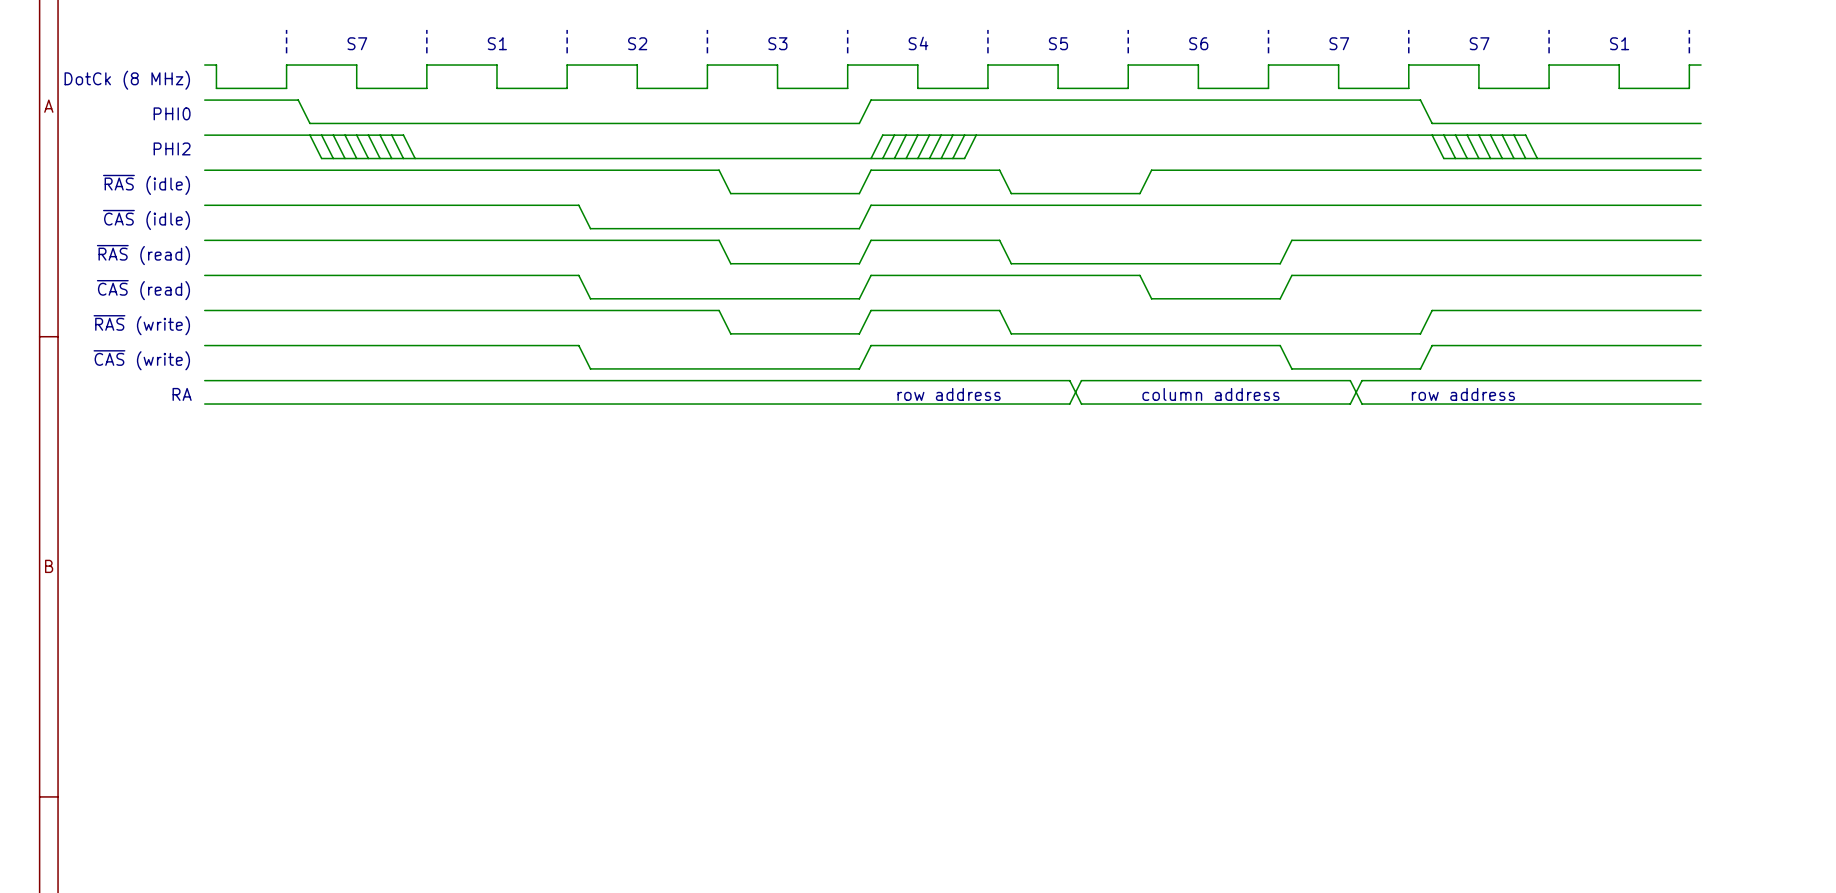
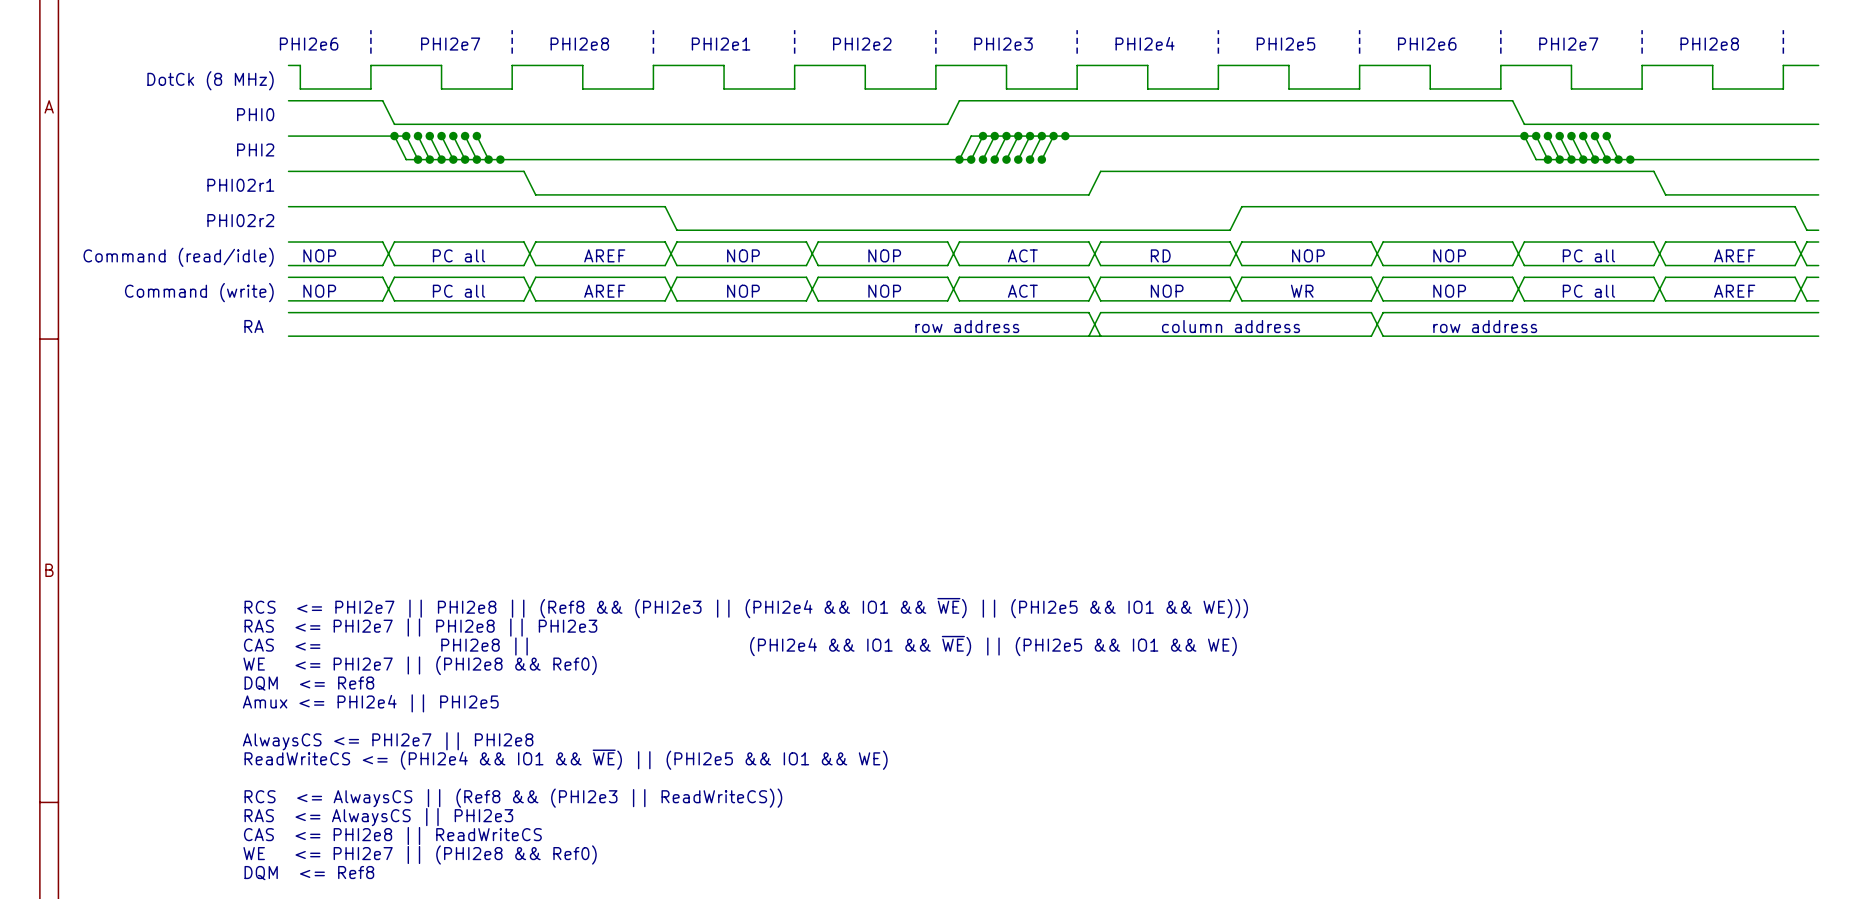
line: (286, 29) (286, 53) -> (370, 30) (370, 53)
line: (426, 29) (426, 53) -> (512, 30) (512, 53)
line: (567, 29) (567, 53) -> (653, 30) (653, 53)
line: (707, 29) (707, 53) -> (794, 30) (794, 53)
line: (847, 29) (847, 53) -> (935, 30) (935, 53)
line: (987, 29) (987, 53) -> (1077, 30) (1077, 53)
line: (1128, 29) (1128, 53) -> (1218, 30) (1218, 53)
line: (1268, 29) (1268, 53) -> (1359, 30) (1359, 53)
line: (1408, 29) (1408, 53) -> (1500, 30) (1500, 53)
line: (1549, 29) (1549, 53) -> (1642, 30) (1642, 53)
line: (1689, 29) (1689, 53) -> (1783, 30) (1783, 53)
text: none -> PHI2e6 (309, 44)
text: S7 (357, 43) -> none
text: none -> PHI2e7 (450, 44)
text: S1 (497, 43) -> none
text: none -> PHI2e8 (579, 44)
text: S2 (637, 43) -> none
text: none -> PHI2e1 (721, 44)
text: S3 (777, 43) -> none
text: none -> PHI2e2 (862, 44)
text: S4 (918, 43) -> none
text: none -> PHI2e3 (1003, 44)
text: S5 (1058, 43) -> none
text: none -> PHI2e4 (1145, 43)
text: S6 (1198, 43) -> none
text: none -> PHI2e5 (1286, 44)
text: S7 (1339, 43) -> none
text: none -> PHI2e6 (1427, 44)
text: S7 (1479, 43) -> none
text: none -> PHI2e7 (1568, 44)
text: S1 (1619, 43) -> none
text: none -> PHI2e8 (1709, 44)
wire: (204, 65) (216, 65) (216, 88) (286, 88) (286, 65) -> none
wire: (298, 65) (356, 65) (356, 88) -> (300, 65) (300, 88) (359, 88)
wire: (426, 65) (426, 88) (368, 88) -> (429, 65) (370, 65) (370, 88)
wire: (438, 65) (496, 65) (496, 88) -> (441, 65) (441, 88) (500, 88)
wire: (567, 65) (567, 88) (508, 88) -> (571, 65) (512, 65) (512, 88)
wire: (578, 65) (637, 65) (637, 88) -> (582, 65) (582, 88) (641, 88)
wire: (707, 65) (707, 88) (648, 88) -> (712, 65) (653, 65) (653, 88)
wire: (719, 65) (777, 65) (777, 88) -> (724, 65) (724, 88) (782, 88)
wire: (847, 65) (847, 88) (789, 88) -> (853, 65) (794, 65) (794, 88)
wire: (859, 65) (917, 65) (917, 88) -> (865, 65) (865, 88) (924, 88)
wire: (987, 65) (987, 88) (929, 88) -> (994, 65) (935, 65) (935, 88)
wire: (999, 65) (1058, 65) (1058, 88) -> (1006, 65) (1006, 88) (1065, 88)
wire: (1128, 65) (1128, 88) (1069, 88) -> (1135, 65) (1077, 65) (1077, 88)
wire: (1139, 65) (1198, 65) (1198, 88) -> (1147, 65) (1147, 88) (1206, 88)
wire: (1268, 65) (1268, 88) (1210, 88) -> (1277, 65) (1218, 65) (1218, 88)
wire: (1280, 65) (1338, 65) (1338, 88) -> (1288, 65) (1288, 88) (1347, 88)
wire: (1408, 65) (1408, 88) (1350, 88) -> (1418, 65) (1359, 65) (1359, 88)
wire: (1420, 65) (1478, 65) (1478, 88) -> (1430, 65) (1430, 88) (1489, 88)
wire: (1549, 65) (1549, 88) (1490, 88) -> (1559, 65) (1500, 65) (1500, 88)
wire: (1560, 65) (1619, 65) (1619, 88) -> (1571, 65) (1571, 88) (1630, 88)
wire: (1689, 65) (1689, 88) (1630, 88) -> (1700, 65) (1642, 65) (1642, 88)
wire: none -> (1712, 65) (1712, 88) (1783, 88) (1783, 65) (1818, 65)
text position: DotCk (8 MHz) (127, 80) -> DotCk (8 MHz) (210, 80)
wire: (204, 100) (286, 100) -> none
wire: (298, 100) (309, 123) (391, 123) -> (300, 100) (382, 100) (394, 124)
wire: (952, 100) (871, 100) (859, 123) -> (959, 100) (947, 124) (865, 124)
wire: (1420, 100) (1432, 123) (1513, 123) -> (1430, 100) (1512, 100) (1524, 124)
text position: PHI0 (172, 113) -> PHI0 (255, 114)
wire: none -> (1712, 124) (1818, 124)
wire: (204, 135) (286, 135) -> none
wire: (309, 135) (321, 158) (403, 158) -> none
wire: (321, 135) (333, 158) -> (418, 136) (429, 159)
wire: (333, 135) (345, 158) -> (429, 136) (441, 159)
wire: (345, 135) (356, 158) -> (441, 136) (453, 159)
wire: (356, 135) (368, 158) -> (453, 136) (465, 159)
wire: (368, 135) (380, 158) -> (465, 136) (476, 159)
wire: (380, 135) (391, 158) -> (476, 136) (488, 159)
junction: none -> (394, 136)
junction: none -> (406, 136)
junction: none -> (418, 136)
junction: none -> (429, 136)
junction: none -> (441, 136)
junction: none -> (453, 136)
junction: none -> (465, 136)
junction: none -> (476, 136)
wire: (894, 135) (882, 158) -> (994, 136) (982, 159)
wire: (906, 135) (894, 158) -> (1006, 136) (994, 159)
wire: (917, 135) (906, 158) -> (1018, 136) (1006, 159)
wire: (929, 135) (917, 158) -> (1030, 136) (1018, 159)
wire: (941, 135) (929, 158) -> (1041, 136) (1030, 159)
wire: (952, 135) (941, 158) -> (1053, 136) (1041, 159)
wire: (964, 135) (882, 135) (871, 158) -> none
junction: none -> (982, 136)
junction: none -> (994, 136)
junction: none -> (1006, 136)
junction: none -> (1018, 136)
junction: none -> (1030, 136)
junction: none -> (1041, 136)
junction: none -> (1053, 136)
junction: none -> (1065, 136)
wire: (1432, 135) (1443, 158) (1525, 158) -> none
wire: (1443, 135) (1455, 158) -> (1547, 136) (1559, 159)
wire: (1455, 135) (1467, 158) -> (1559, 136) (1571, 159)
wire: (1467, 135) (1478, 158) -> (1571, 136) (1583, 159)
wire: (1478, 135) (1490, 158) -> (1583, 136) (1595, 159)
wire: (1490, 135) (1502, 158) -> (1595, 136) (1606, 159)
wire: (1502, 135) (1513, 158) -> (1606, 136) (1618, 159)
junction: none -> (1524, 136)
junction: none -> (1536, 136)
junction: none -> (1547, 136)
junction: none -> (1559, 136)
junction: none -> (1571, 136)
junction: none -> (1583, 136)
junction: none -> (1595, 136)
junction: none -> (1606, 136)
text position: PHI2 (172, 148) -> PHI2 (255, 149)
junction: none -> (418, 159)
junction: none -> (429, 159)
junction: none -> (441, 159)
junction: none -> (453, 159)
junction: none -> (465, 159)
junction: none -> (476, 159)
junction: none -> (488, 159)
junction: none -> (500, 159)
junction: none -> (959, 159)
junction: none -> (971, 159)
junction: none -> (982, 159)
junction: none -> (994, 159)
junction: none -> (1006, 159)
junction: none -> (1018, 159)
junction: none -> (1030, 159)
junction: none -> (1041, 159)
junction: none -> (1547, 159)
junction: none -> (1559, 159)
junction: none -> (1571, 159)
junction: none -> (1583, 159)
junction: none -> (1595, 159)
junction: none -> (1606, 159)
junction: none -> (1618, 159)
junction: none -> (1630, 159)
wire: none -> (1712, 159) (1818, 159)
wire: (204, 170) (286, 170) -> none
wire: (520, 170) (719, 170) (730, 193) -> (523, 171) (535, 194) (735, 194)
wire: (1151, 170) (1139, 193) (1081, 193) -> (1159, 171) (1100, 171) (1088, 194)
wire: (1642, 170) (1701, 170) -> (1653, 171) (1665, 194) (1818, 194)
text: ~{RAS} (idle) (146, 184) -> none
text: none -> PHI02r1 (240, 185)
wire: (859, 193) (871, 170) (999, 170) (1011, 193) -> (865, 194) (1018, 194)
wire: (204, 205) (286, 205) -> none
wire: (578, 205) (590, 228) (672, 228) -> (582, 206) (665, 206) (676, 230)
wire: (1233, 205) (871, 205) (859, 228) -> (1241, 206) (1230, 230) (865, 230)
wire: none -> (1712, 206) (1795, 206) (1806, 230) (1818, 230)
text: ~{CAS} (idle) (146, 219) -> none
text: none -> PHI02r2 (240, 220)
wire: (204, 240) (286, 240) -> none
wire: (380, 240) (391, 240) -> (288, 265) (382, 265) (394, 242)
wire: (520, 240) (532, 240) -> (382, 242) (394, 265) (523, 265) (535, 242)
wire: (660, 240) (672, 240) -> (523, 242) (535, 265) (665, 265) (676, 242)
wire: (719, 240) (730, 263) -> (665, 242) (676, 265) (735, 265)
wire: (871, 240) (859, 263) -> (877, 242) (818, 242) (806, 265)
wire: (941, 240) (952, 240) -> (865, 265) (947, 265) (959, 242)
wire: (999, 240) (1011, 263) -> (947, 242) (959, 265) (1018, 265)
wire: (1291, 240) (1280, 263) -> (1300, 242) (1241, 242) (1230, 265)
wire: (1362, 240) (1373, 240) -> (1288, 265) (1371, 265) (1383, 242)
wire: none -> (1371, 242) (1383, 265) (1512, 265) (1524, 242)
wire: (1502, 240) (1513, 240) -> (1512, 242) (1524, 265) (1653, 265) (1665, 242)
wire: (1642, 240) (1654, 240) -> (1653, 242) (1665, 265) (1795, 265) (1806, 242) (1818, 242)
wire: none -> (1712, 242) (1795, 242) (1806, 265) (1818, 265)
text: none -> NOP (319, 255)
text: none -> PC all (459, 255)
text: none -> AREF (604, 255)
text: none -> NOP (743, 255)
text: none -> NOP (884, 255)
text: none -> ACT (1022, 255)
text: none -> RD (1160, 255)
text: none -> NOP (1308, 255)
text: none -> NOP (1449, 255)
text: none -> PC all (1588, 255)
text: none -> AREF (1734, 255)
text: ~{RAS} (read) (143, 255) -> none
text: none -> Command (read/idle) (178, 257)
wire: (800, 263) (812, 263) -> (724, 242) (806, 242) (818, 265)
wire: (1081, 263) (1093, 263) -> (1006, 242) (1088, 242) (1100, 265)
wire: (1221, 263) (1233, 263) -> (1088, 265) (1100, 242) (1230, 242) (1241, 265)
wire: (204, 275) (286, 275) -> none
wire: (380, 275) (391, 275) -> (288, 300) (382, 300) (394, 277)
wire: (520, 275) (532, 275) -> (382, 277) (394, 300) (523, 300) (535, 277)
wire: (578, 275) (590, 298) -> (523, 277) (535, 300) (594, 300)
wire: (871, 275) (859, 298) -> (877, 277) (818, 277) (806, 300)
wire: (941, 275) (952, 275) -> (865, 300) (947, 300) (959, 277)
wire: (1081, 275) (1093, 275) -> (947, 277) (959, 300) (1088, 300) (1100, 277)
wire: (1139, 275) (1151, 298) -> (1088, 277) (1100, 300) (1159, 300)
wire: (1291, 275) (1280, 298) -> (1300, 277) (1241, 277) (1230, 300)
wire: (1362, 275) (1373, 275) -> (1288, 300) (1371, 300) (1383, 277)
wire: none -> (1371, 277) (1383, 300) (1512, 300) (1524, 277)
wire: (1502, 275) (1513, 275) -> (1512, 277) (1524, 300) (1653, 300) (1665, 277)
wire: (1642, 275) (1654, 275) -> (1653, 277) (1665, 300) (1795, 300) (1806, 277) (1818, 277)
wire: none -> (1712, 277) (1795, 277) (1806, 300) (1818, 300)
text: none -> NOP (319, 291)
text: none -> PC all (459, 291)
text: none -> AREF (604, 291)
text: none -> NOP (743, 291)
text: none -> NOP (884, 291)
text: none -> ACT (1022, 291)
text: none -> NOP (1167, 291)
text: none -> WR (1302, 291)
text: none -> NOP (1449, 291)
text: none -> PC all (1588, 291)
text: none -> AREF (1734, 291)
text: ~{CAS} (read) (143, 290) -> none
text: none -> Command (write) (199, 292)
wire: (660, 298) (672, 298) -> (582, 277) (665, 277) (676, 300)
wire: (800, 298) (812, 298) -> (665, 300) (676, 277) (806, 277) (818, 300)
wire: (1221, 298) (1233, 298) -> (1147, 277) (1230, 277) (1241, 300)
wire: (204, 310) (286, 310) -> none
wire: (719, 310) (730, 333) -> (724, 312) (877, 312)
wire: (871, 310) (859, 333) -> (1018, 336) (865, 336)
wire: (999, 310) (1011, 333) -> (1006, 312) (1088, 312) (1100, 336)
wire: (1432, 310) (1420, 333) -> (1442, 312) (1383, 312) (1371, 336)
wire: none -> (1712, 312) (1818, 312)
text: ~{RAS} (write) (141, 325) -> none
wire: none -> (288, 336) (735, 336)
wire: (1362, 333) (1373, 333) -> (1088, 336) (1100, 312) (1371, 312) (1383, 336)
wire: none -> (1430, 336) (1818, 336)
wire: (204, 345) (578, 345) (590, 368) (859, 368) (871, 345) (1280, 345) (1291, 368) (1420, 368) (1432, 345) (1701, 345) -> none
text: ~{CAS} (write) (141, 360) -> none
wire: (204, 380) (1069, 380) (1081, 404) (1350, 404) (1362, 380) (1701, 380) -> none
text position: RA (182, 394) -> RA (253, 326)
text position: row address (949, 394) -> row address (967, 326)
text position: column address (1210, 394) -> column address (1231, 326)
text position: row address (1463, 394) -> row address (1485, 326)
wire: (204, 404) (1069, 404) (1081, 380) (1350, 380) (1362, 404) (1701, 404) -> none
text: none -> RCS <= PHI2e7 || PHI2e8 || (Ref8 && (PHI2e3 || (PHI2e4 && IO1 && ~{WE}) || (PHI2e5 && IO1 && WE))) (746, 608)
text: none -> RAS <= PHI2e7 || PHI2e8 || PHI2e3 (420, 627)
text: none -> CAS <= PHI2e8 || (PHI2e4 && IO1 && ~{WE}) || (PHI2e5 && IO1 && WE) (740, 646)
text: none -> WE <= PHI2e7 || (PHI2e8 && Ref0) (420, 665)
text: none -> DQM <= Ref8 (309, 683)
text: none -> Amux <= PHI2e4 || PHI2e5 (370, 703)
text: none -> AlwaysCS <= PHI2e7 || PHI2e8 (388, 741)
text: none -> ReadWriteCS <= (PHI2e4 && IO1 && ~{WE}) || (PHI2e5 && IO1 && WE) (566, 759)
text: none -> RCS <= AlwaysCS || (Ref8 && (PHI2e3 || ReadWriteCS)) (513, 798)
text: none -> RAS <= AlwaysCS || PHI2e3 (378, 817)
text: none -> CAS <= PHI2e8 || ReadWriteCS (392, 836)
text: none -> WE <= PHI2e7 || (PHI2e8 && Ref0) (420, 854)
text: none -> DQM <= Ref8 (309, 873)

